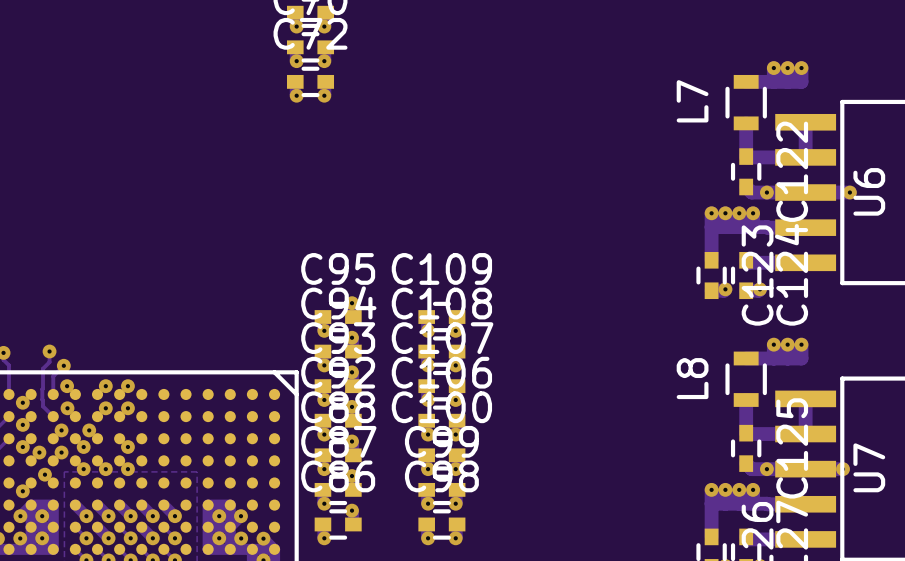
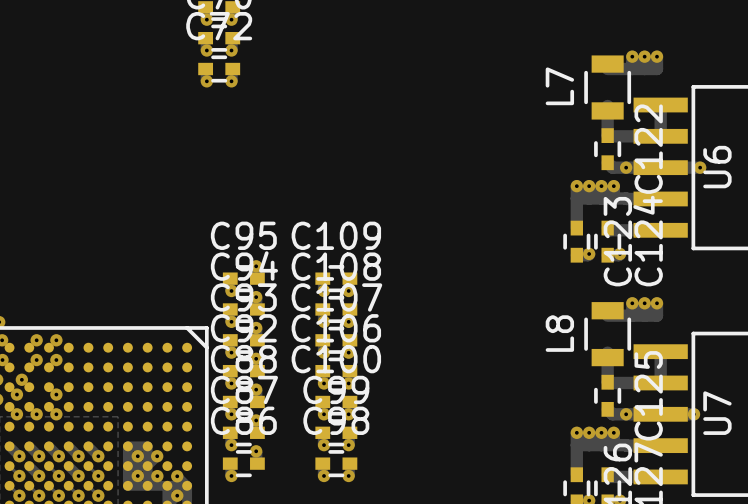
L7 footprint: [725, 74, 767, 131] -> [584, 55, 632, 120]
L8 footprint: [725, 351, 767, 407] -> [584, 302, 632, 367]

